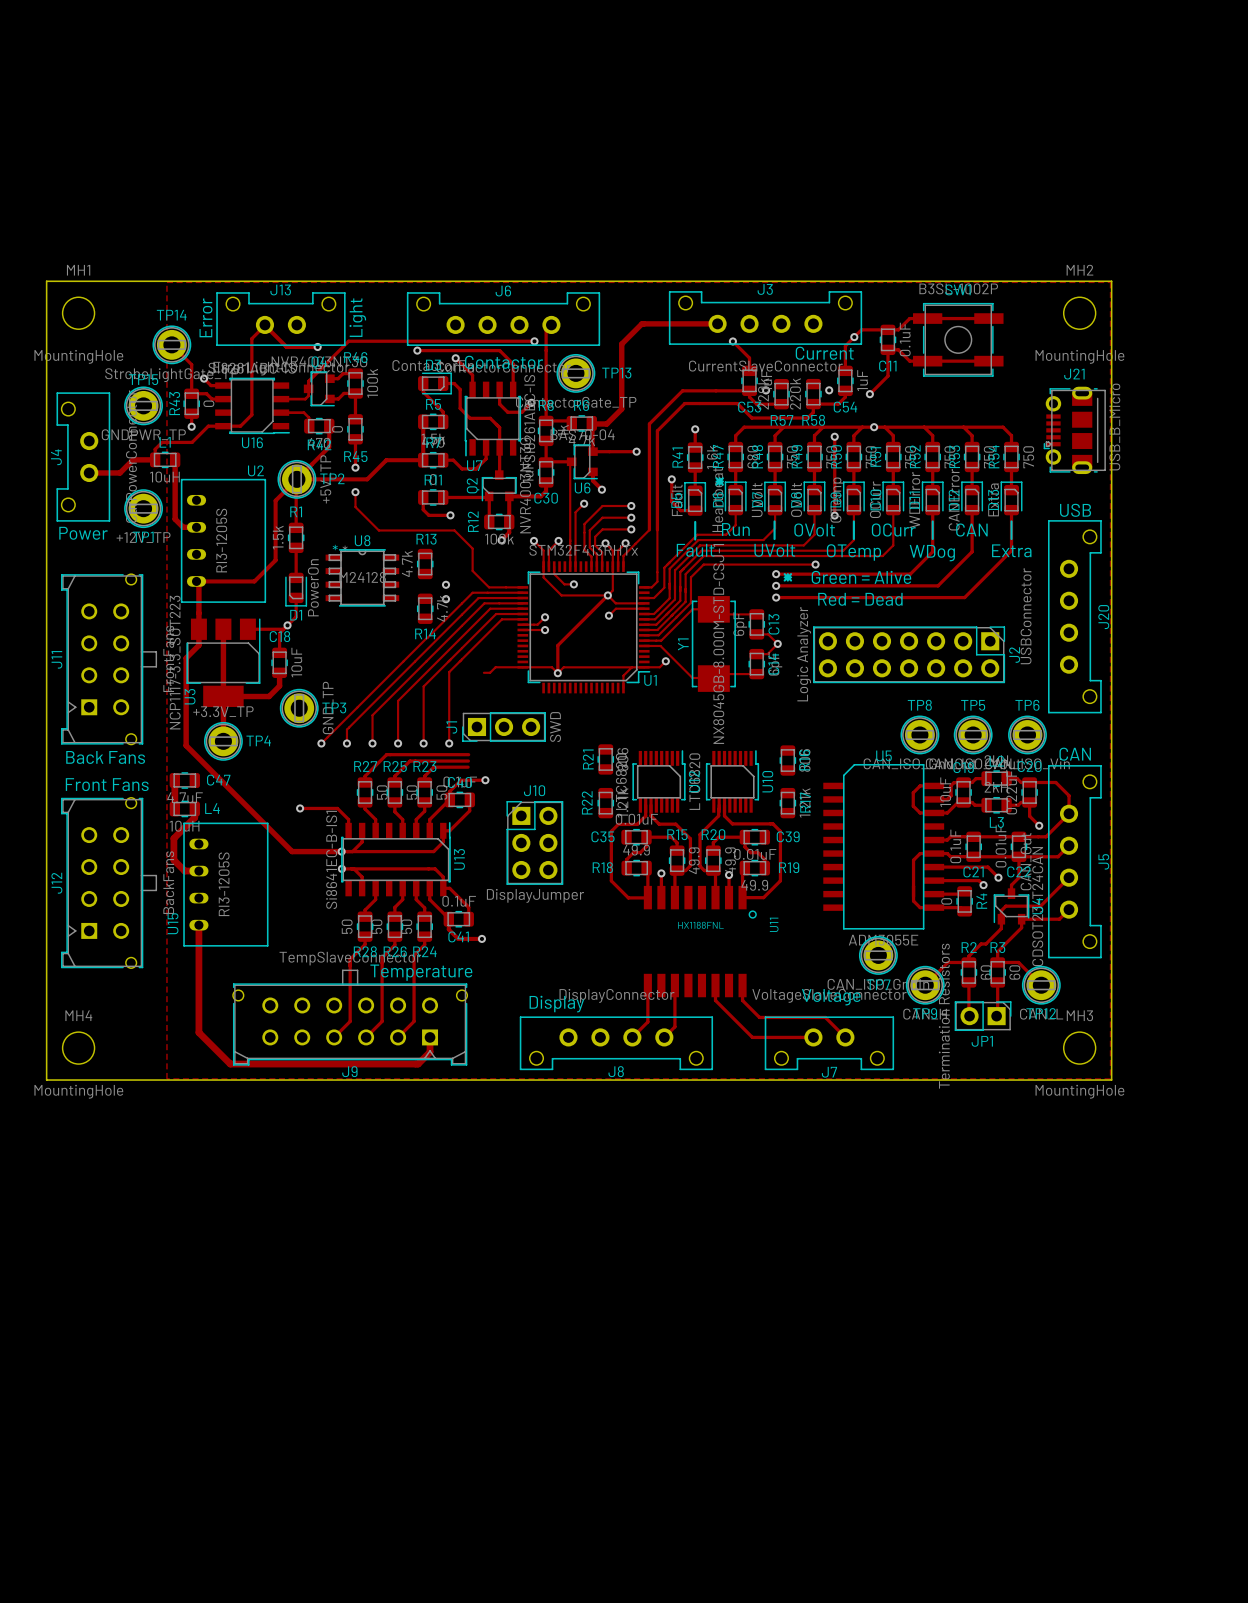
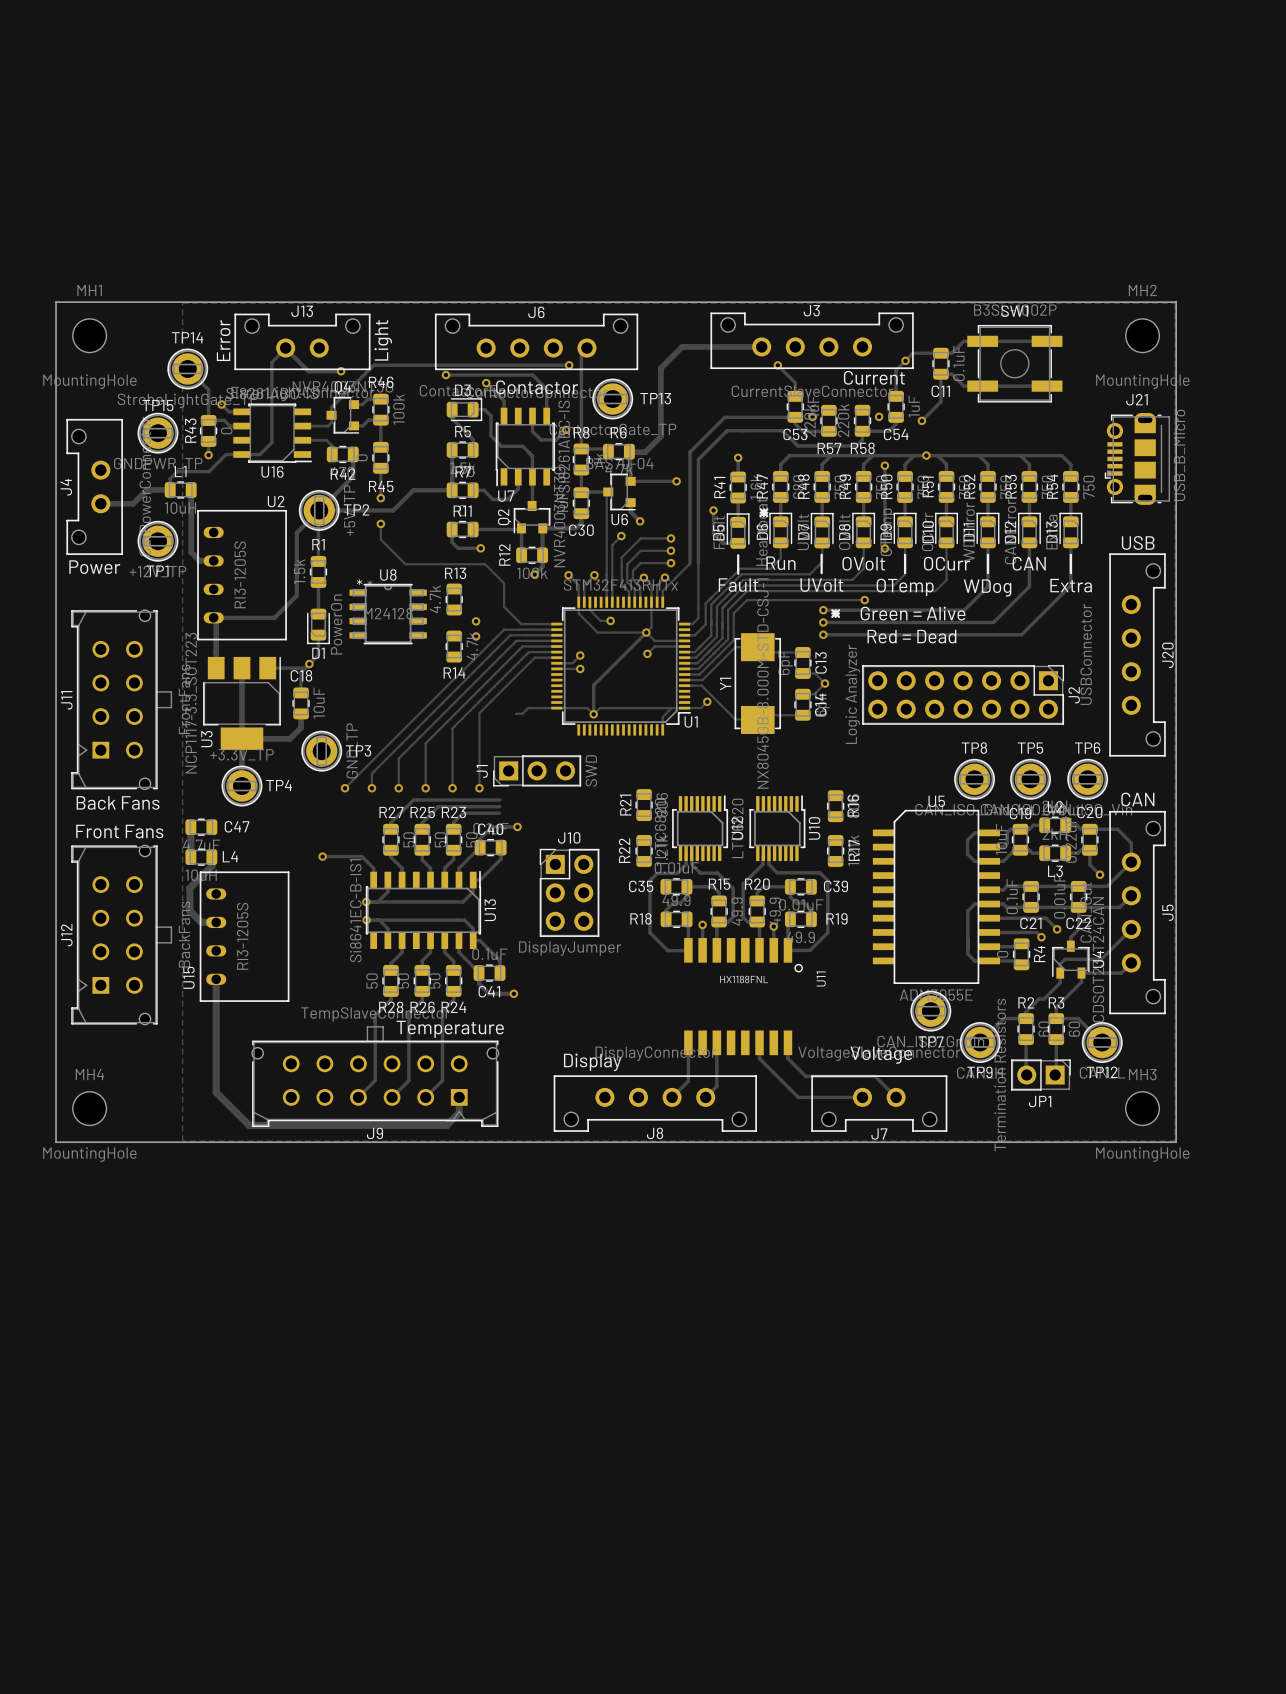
track: (198, 629) (198, 645) (186, 658) (186, 745) (292, 851) (341, 851) -> none

